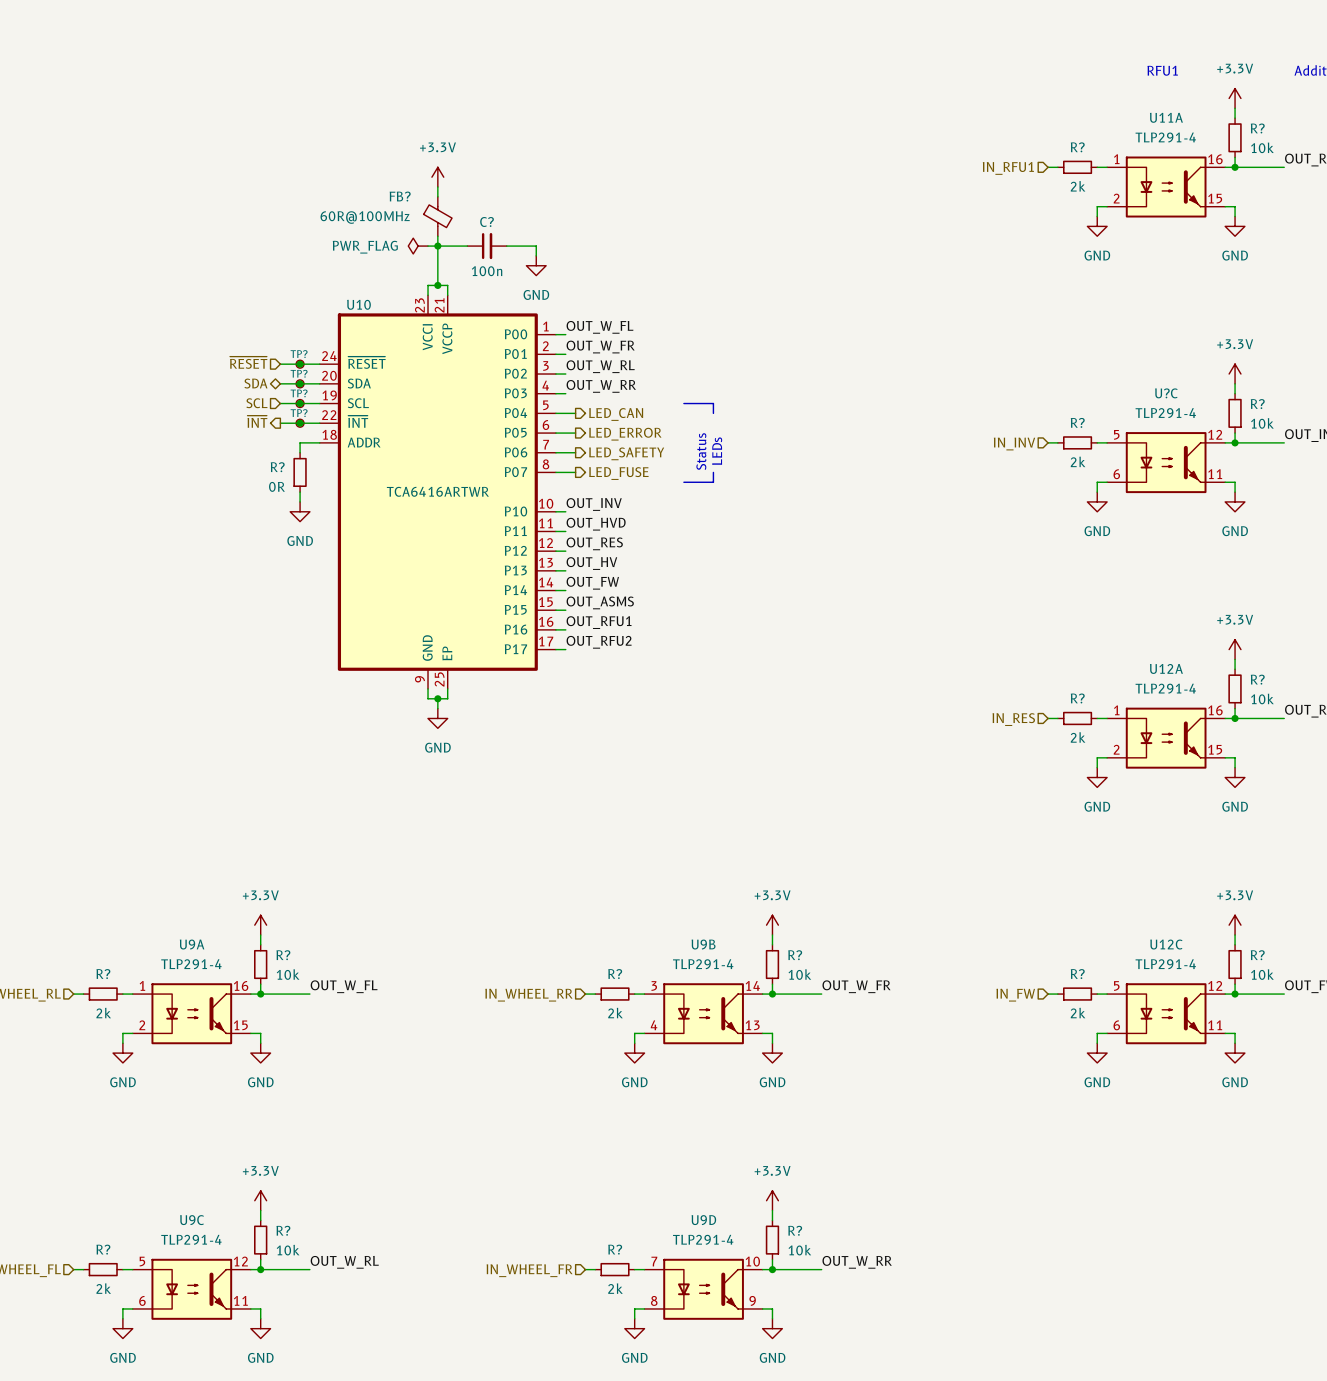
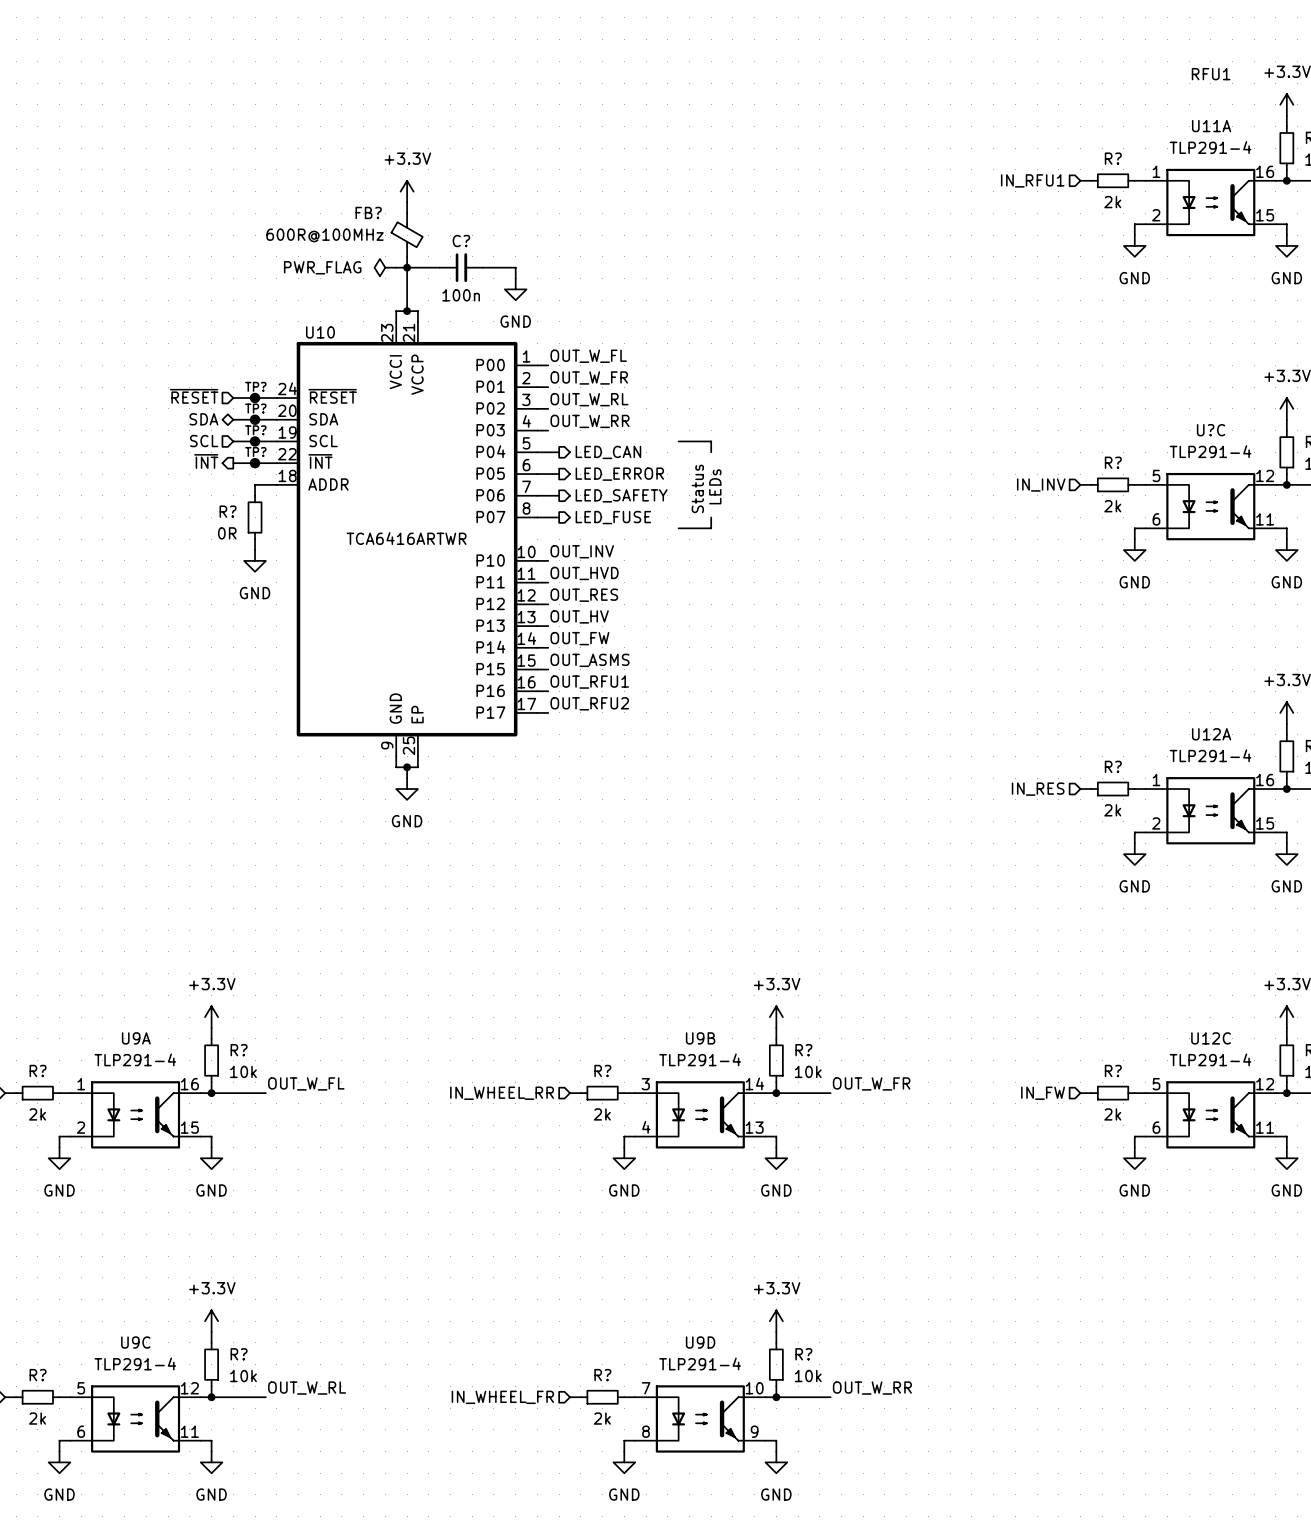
FB? value: 60R@100MHz (365, 217) -> 600R@100MHz (325, 235)

